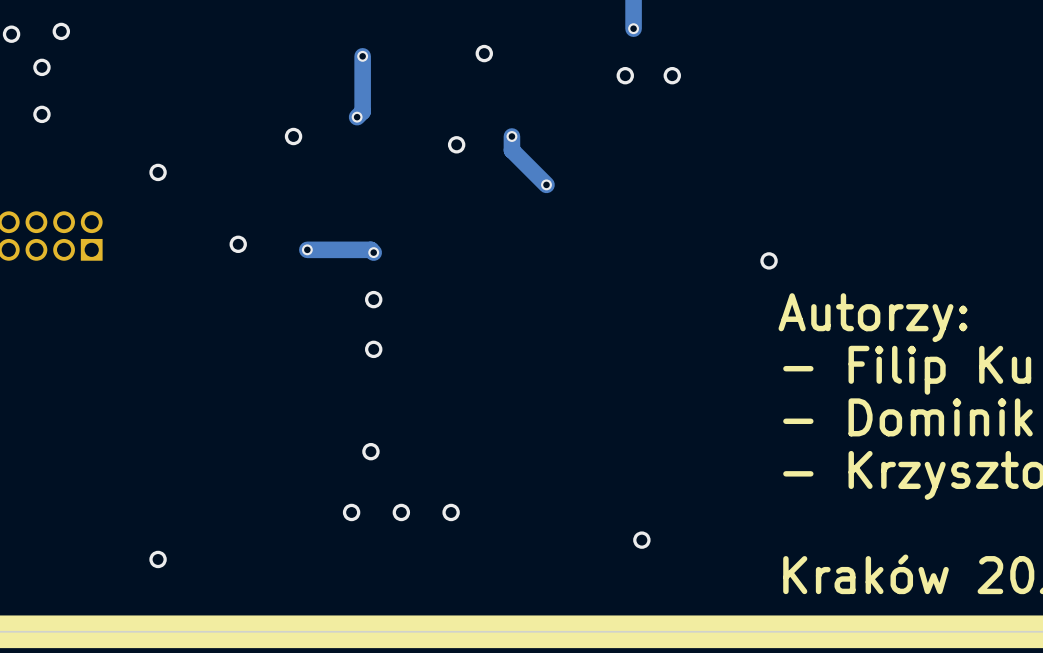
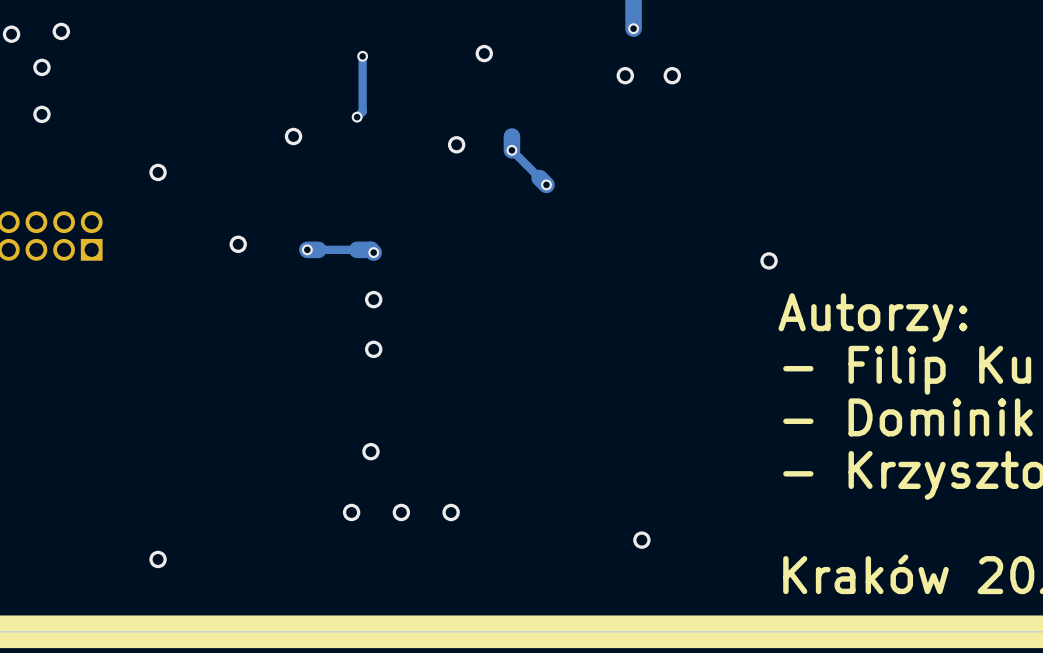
track width: thick (362, 56) (362, 111) (357, 117) -> thin (362, 56) (362, 111) (357, 117)
via position: (511, 136) -> (511, 150)
track width: thick (511, 150) (539, 177) -> thin (511, 150) (539, 177)
track width: thick (357, 249) (318, 249) -> thin (357, 249) (318, 249)

